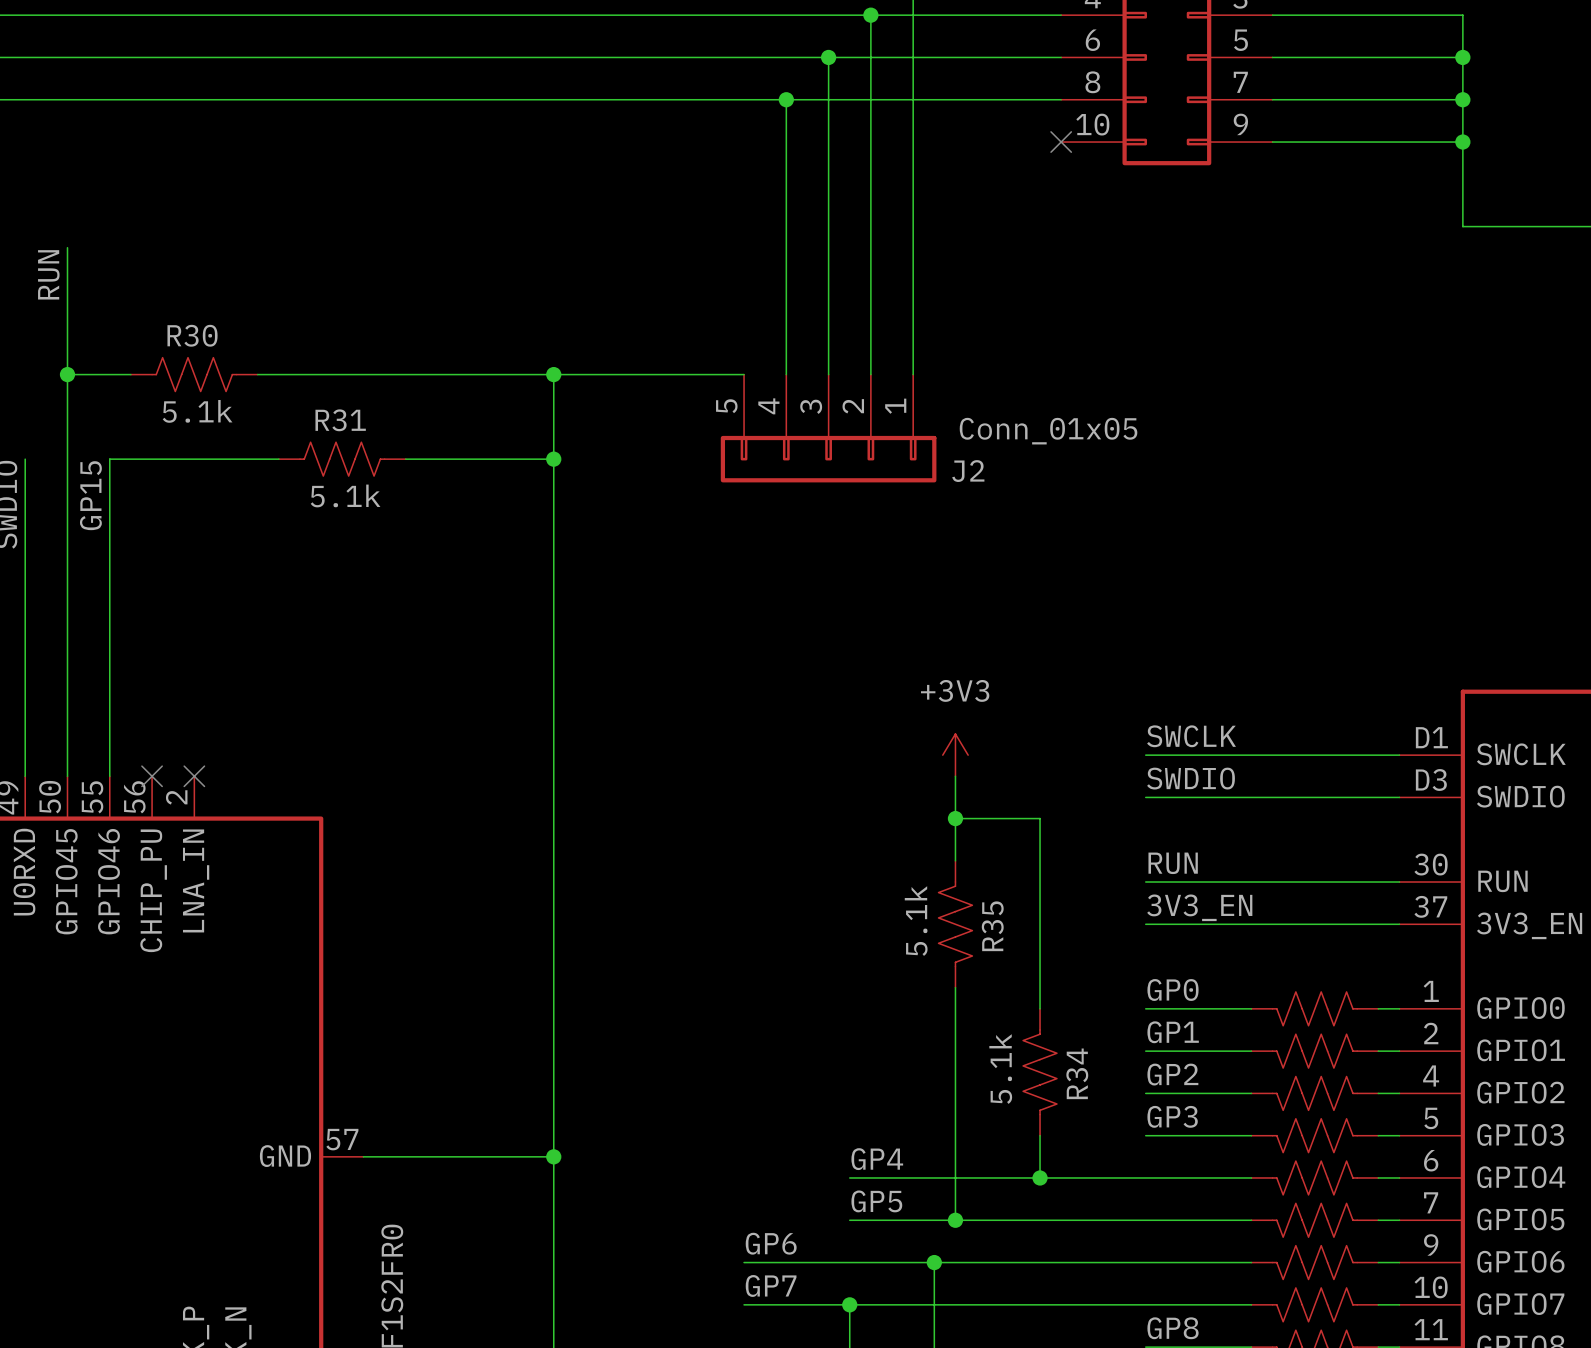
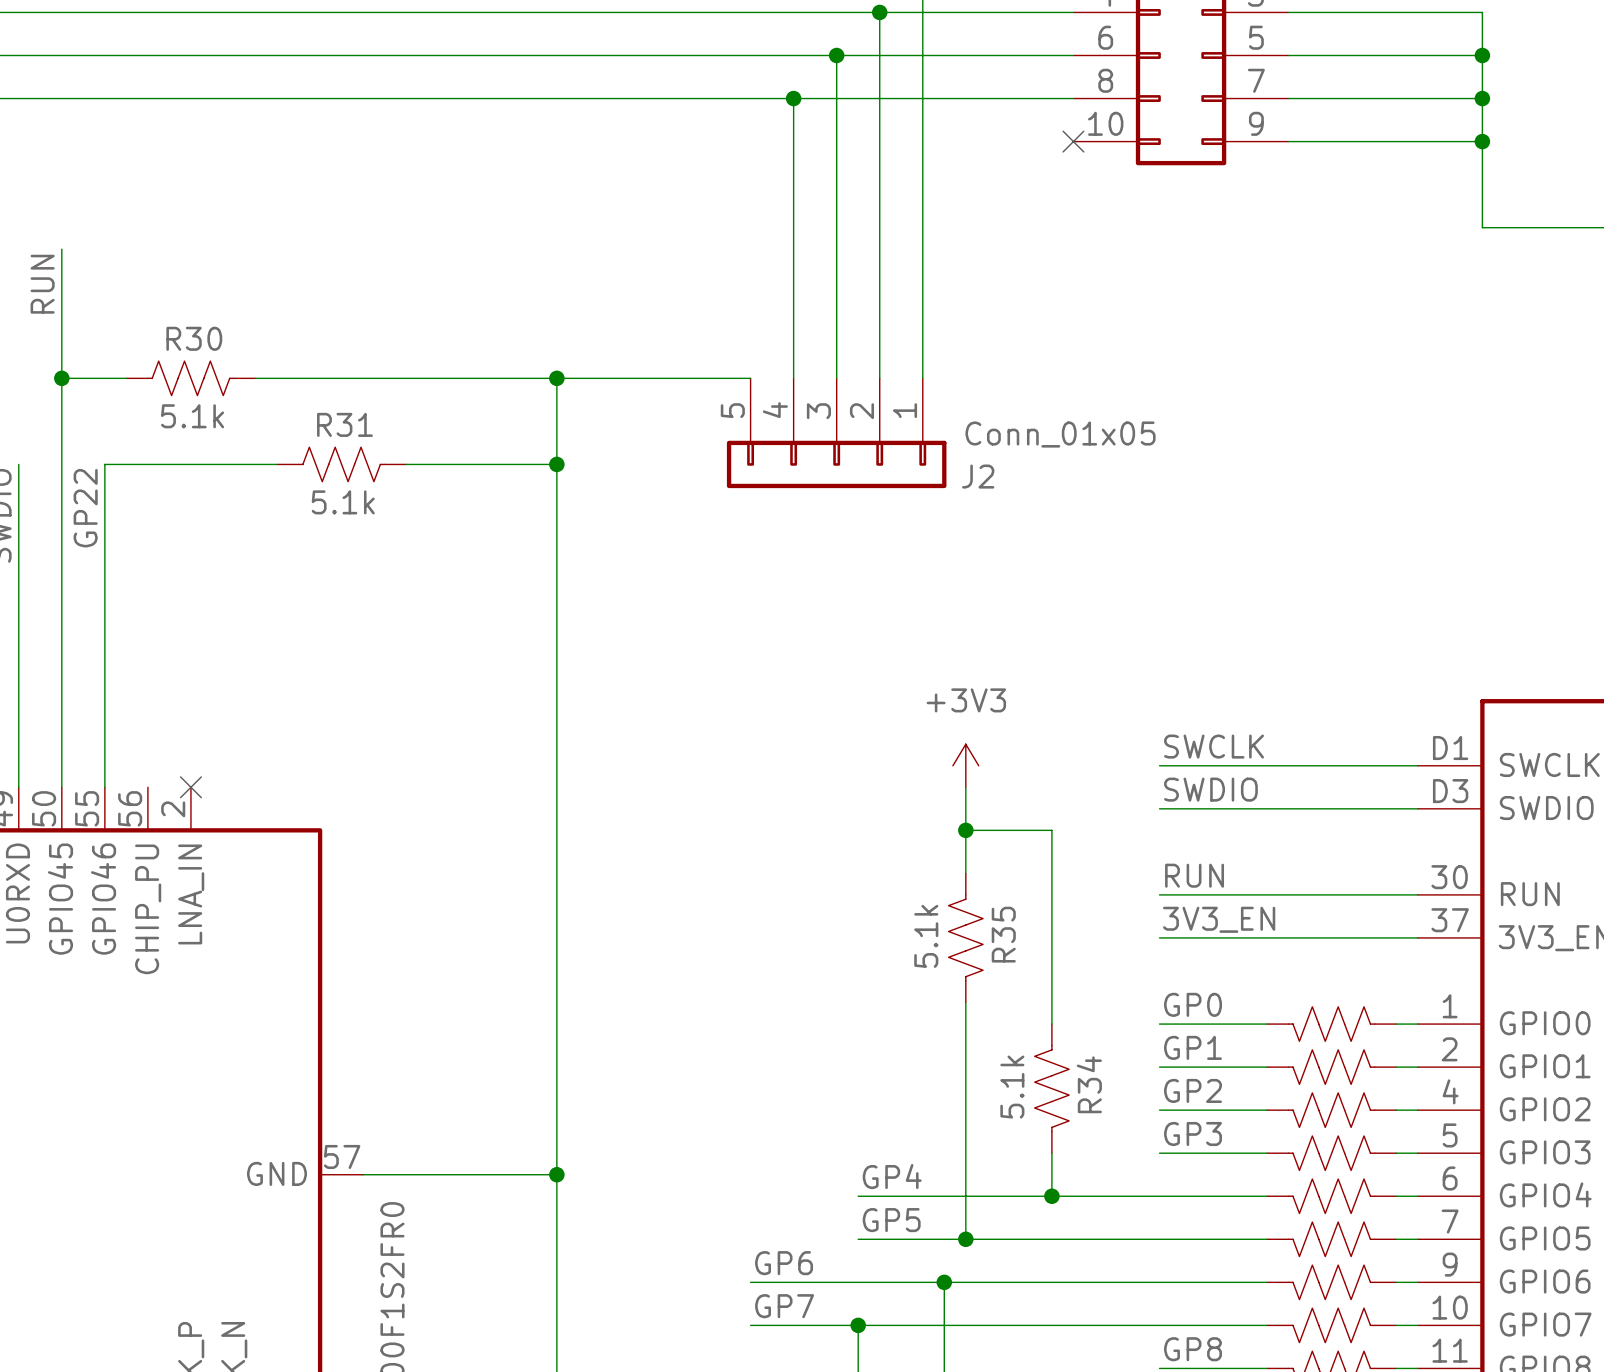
label: GP15 (90, 495) -> GP22 (85, 508)
no-connect mark: (152, 776) -> none

